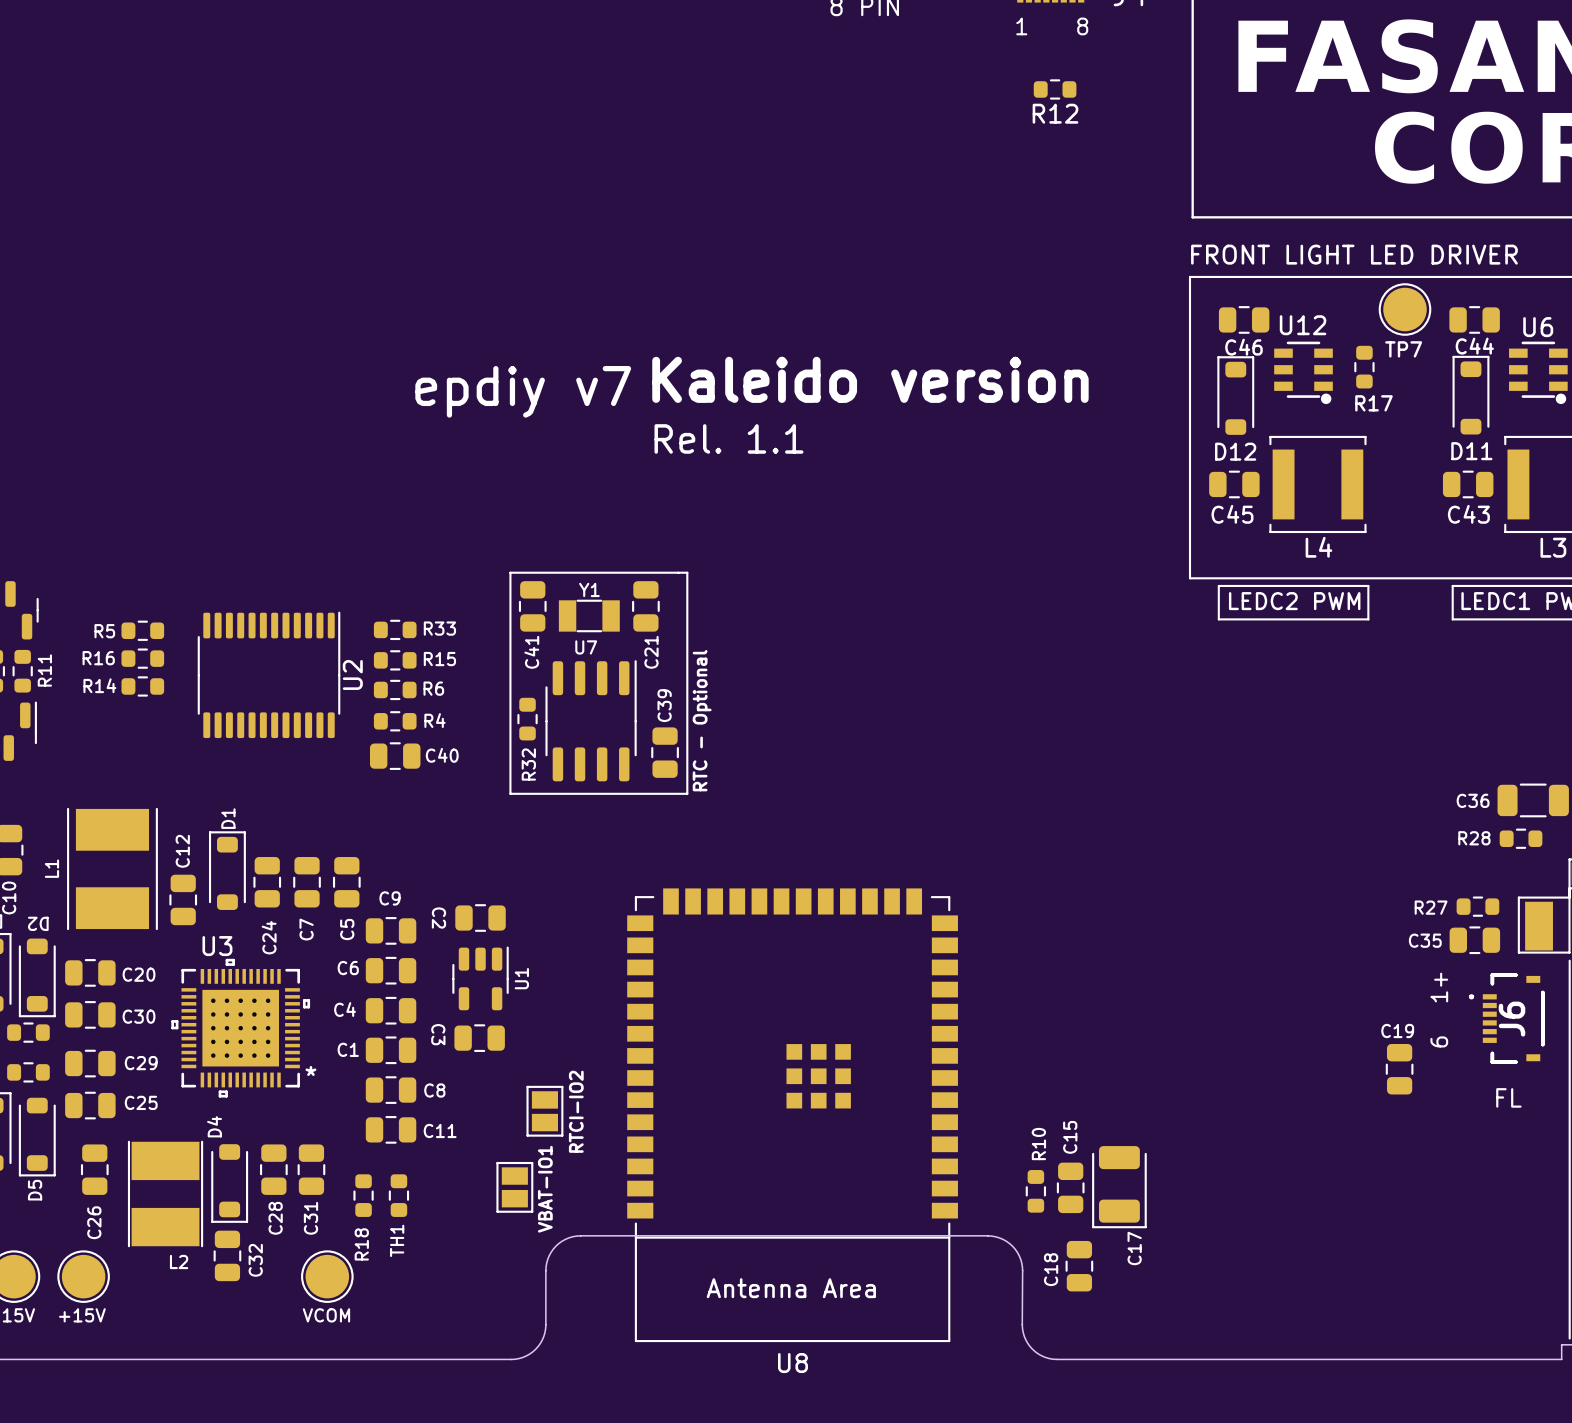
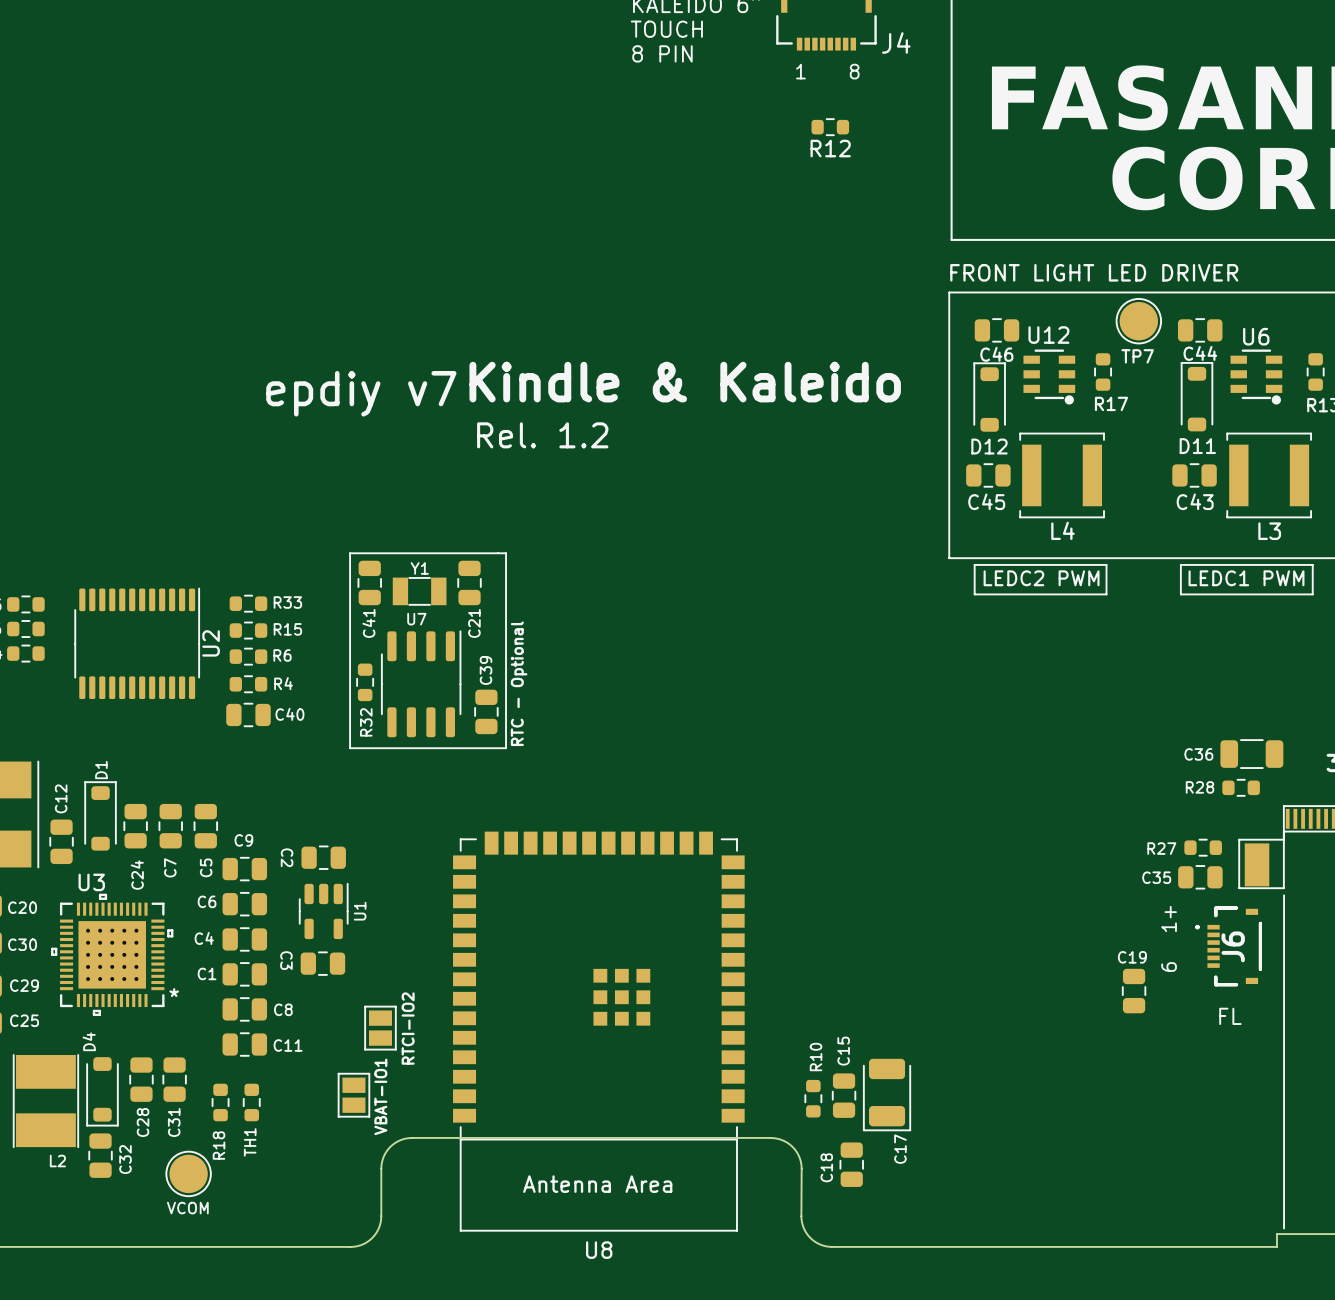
text: none -> Kindle & Kaleido (685, 382)
text: Kaleido version (870, 379) -> none
text: Rel. 1.1 (728, 438) -> Rel. 1.2 (542, 435)

